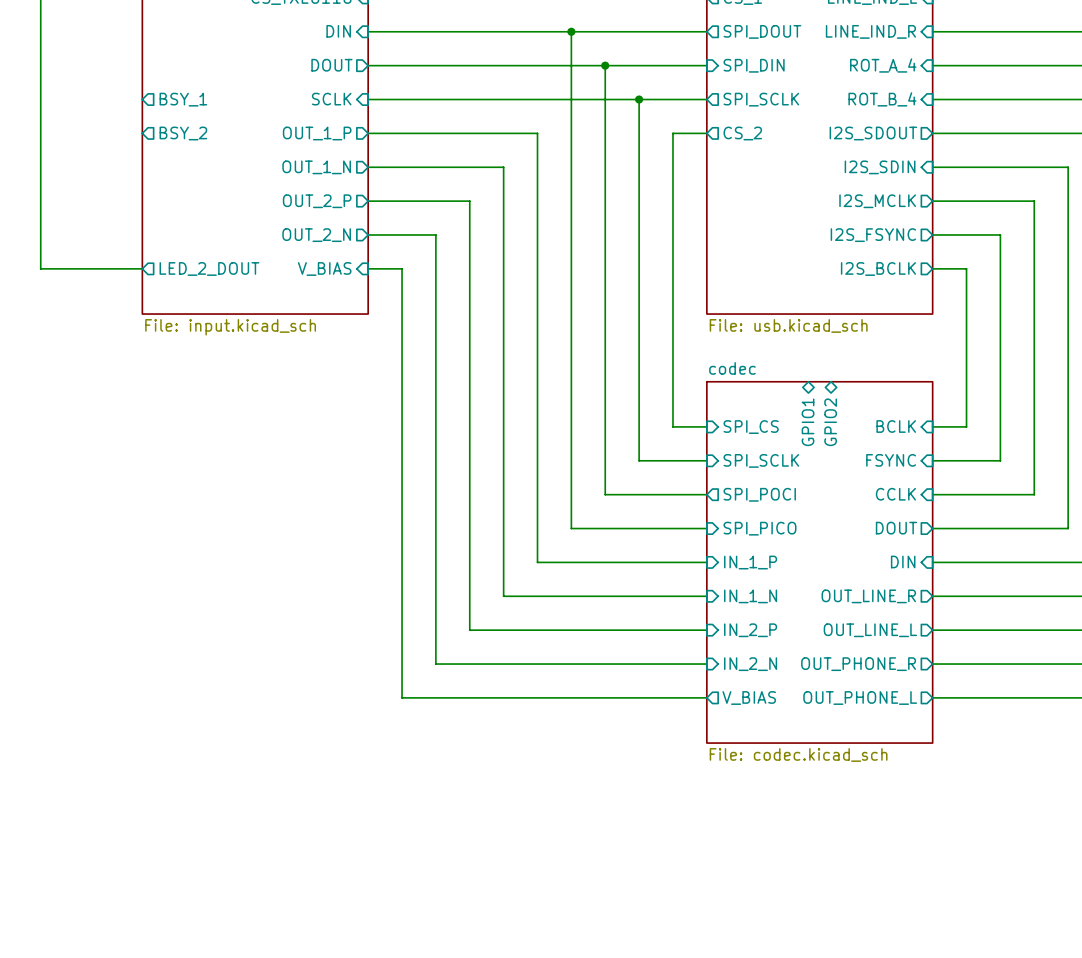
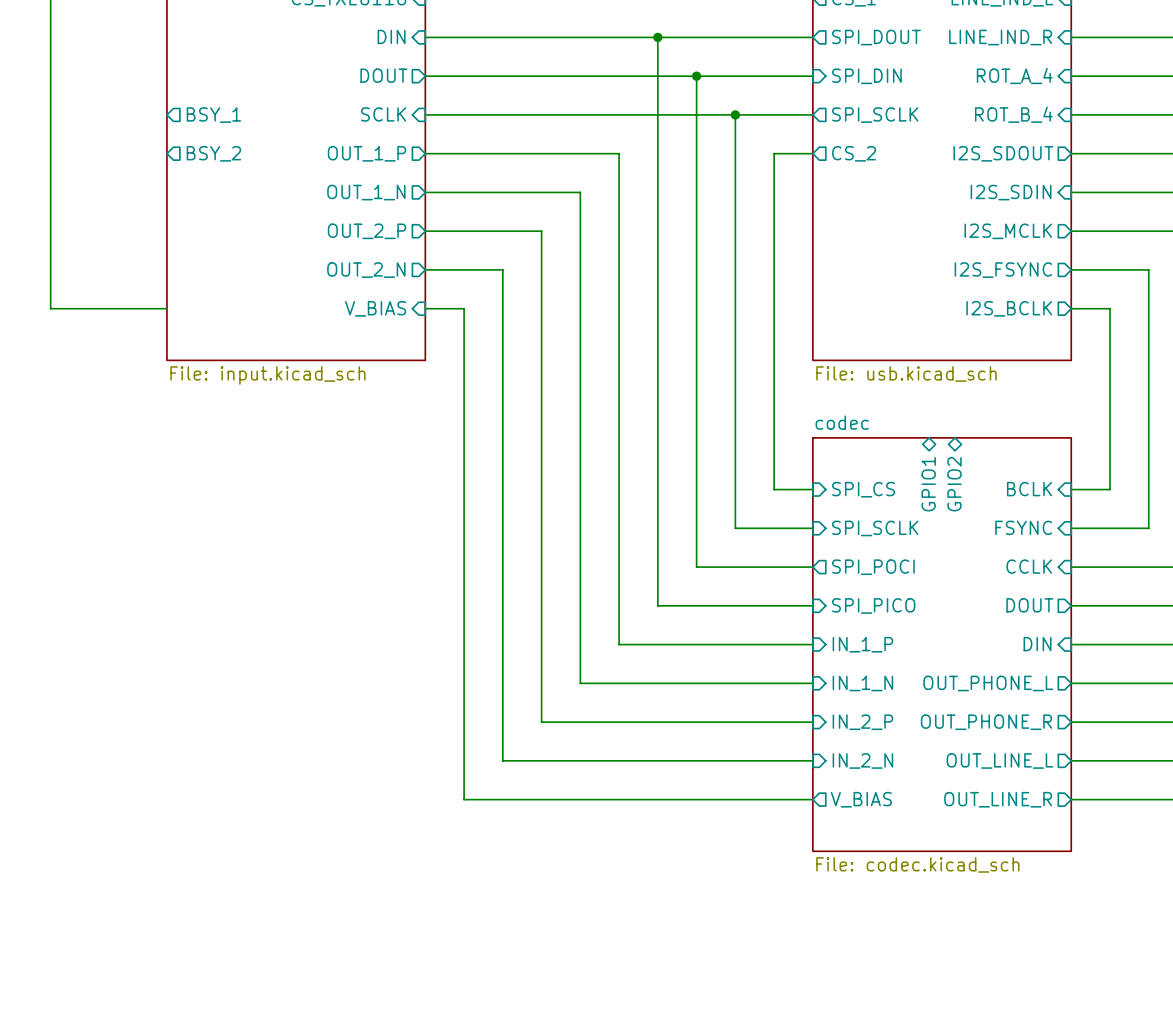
sheet pin: LED_2_DOUT (209, 268) -> none
sheet pin: OUT_LINE_R (868, 596) -> OUT_PHONE_L (988, 683)
sheet pin: OUT_LINE_L (870, 630) -> OUT_PHONE_R (986, 722)
sheet pin: OUT_PHONE_R (858, 664) -> OUT_LINE_L (1000, 760)
sheet pin: OUT_PHONE_L (860, 698) -> OUT_LINE_R (998, 799)

